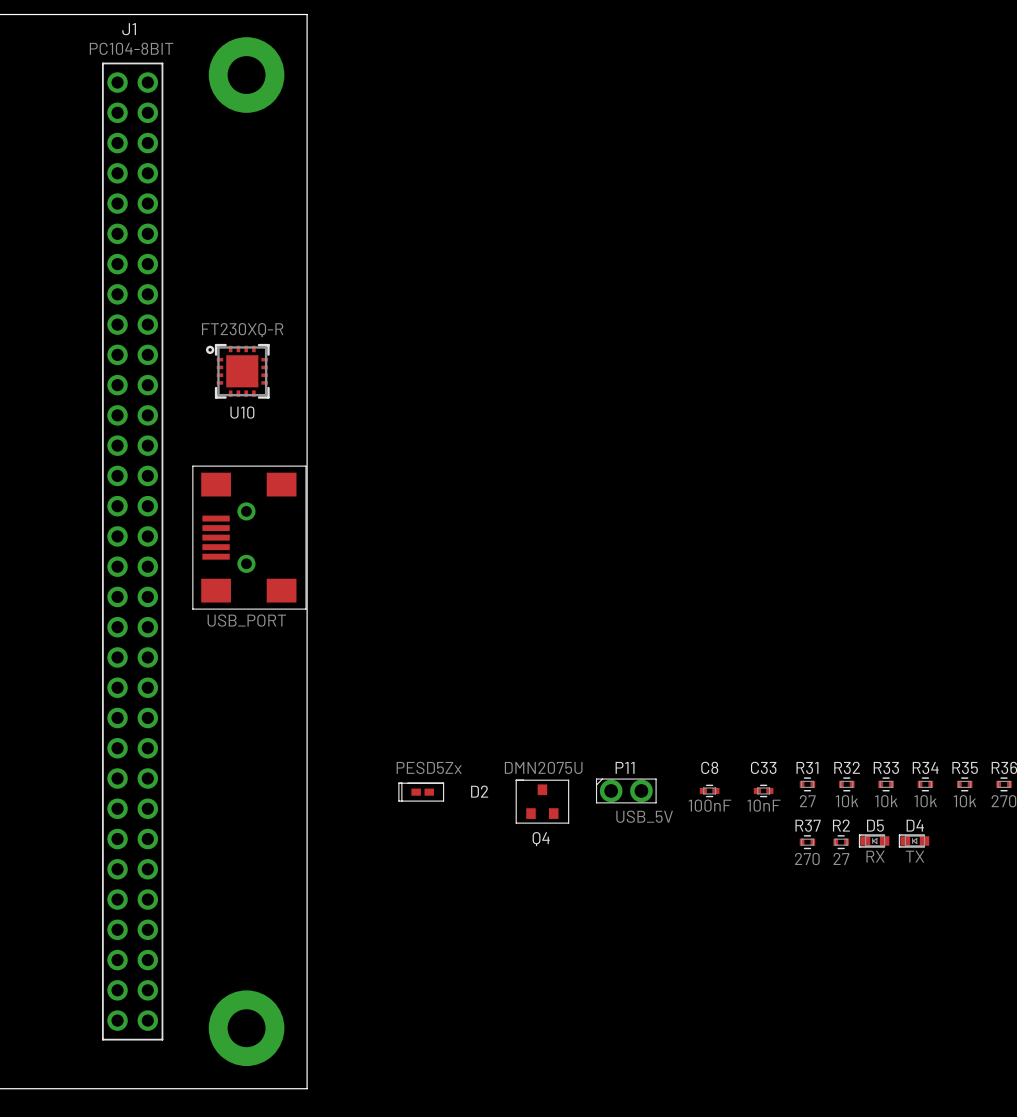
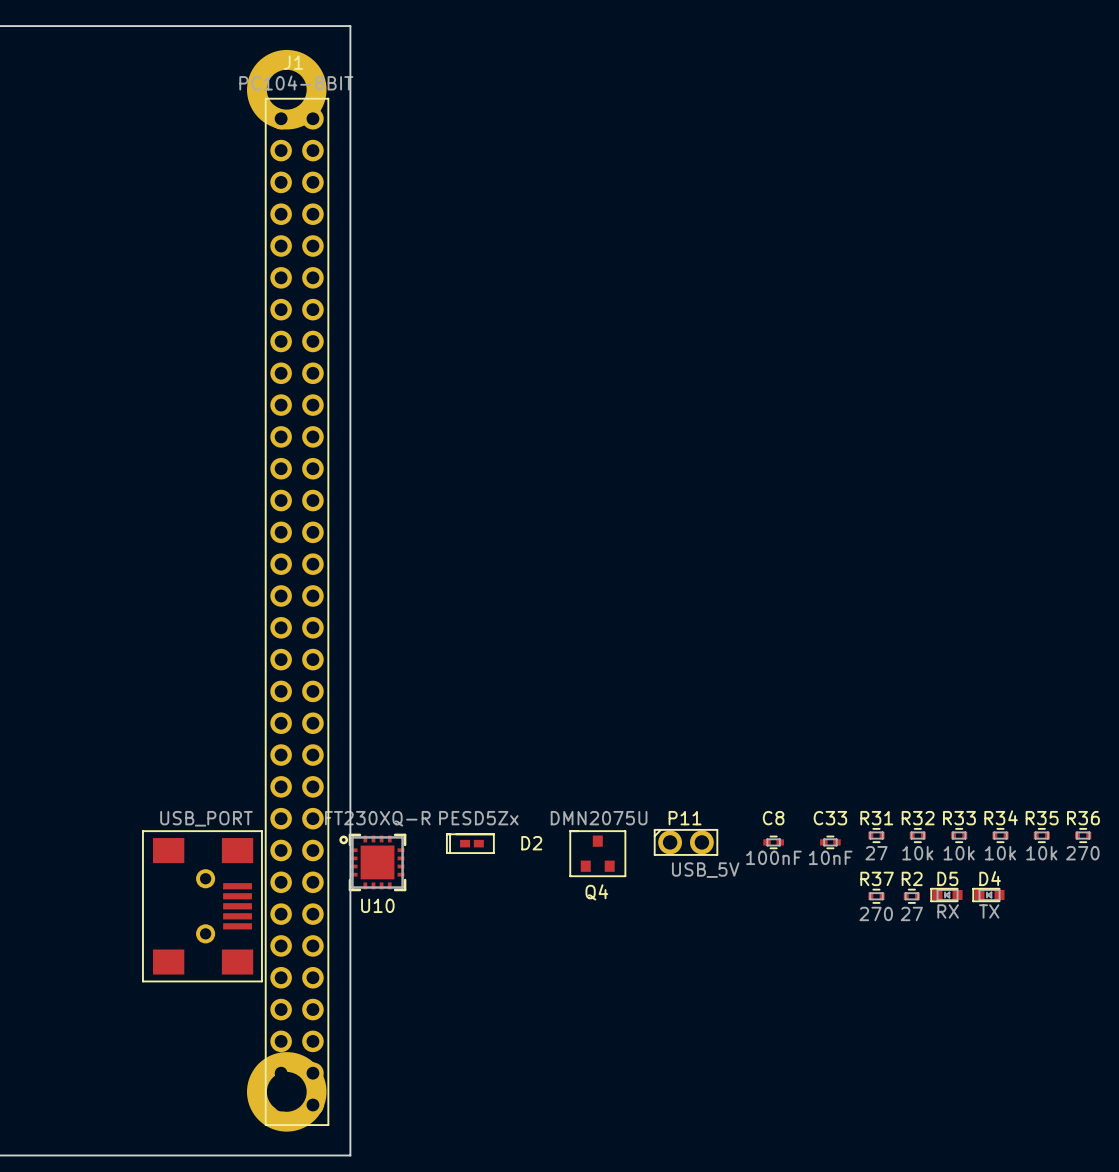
U10 position: (237, 371) -> (372, 862)
part: USB_PORT (249, 537) -> none
J1 position: (132, 551) -> (297, 611)
part: none -> USB_PORT (202, 906)

